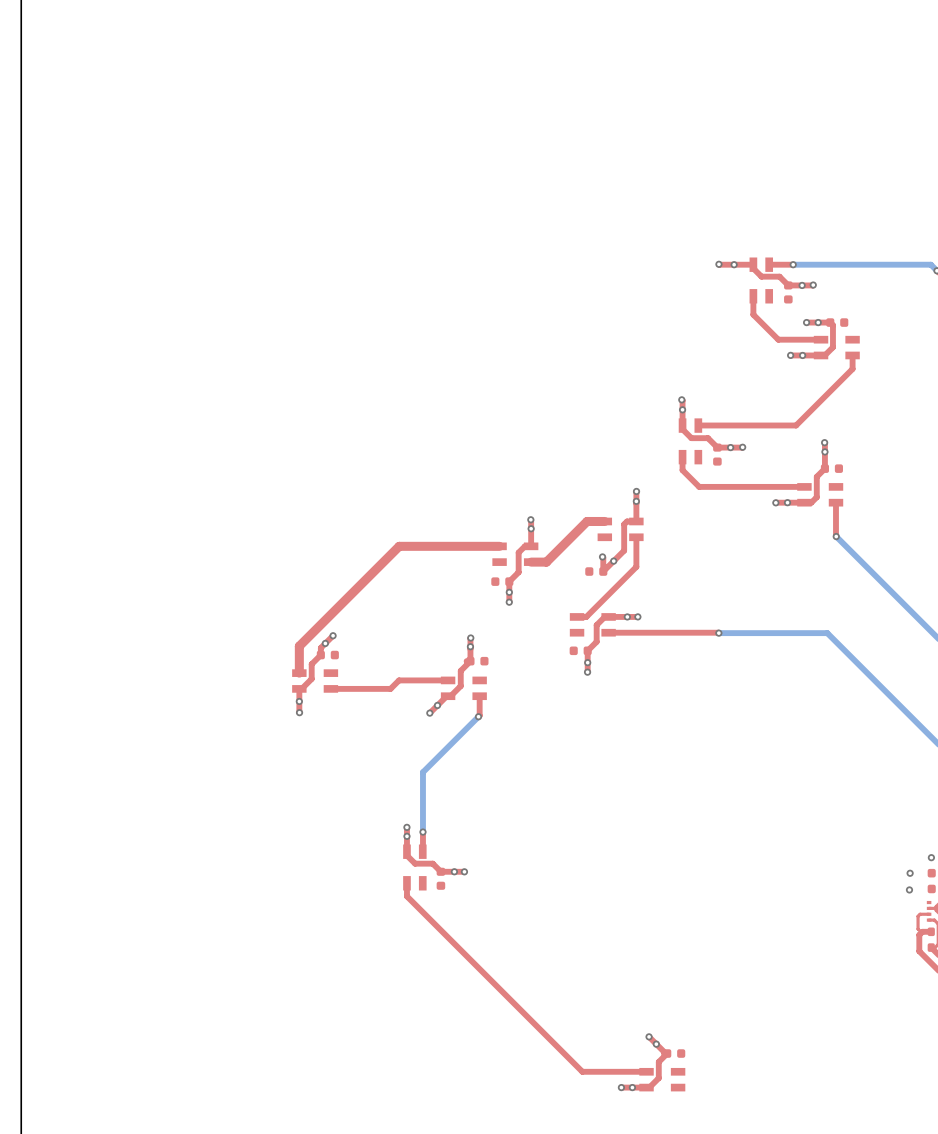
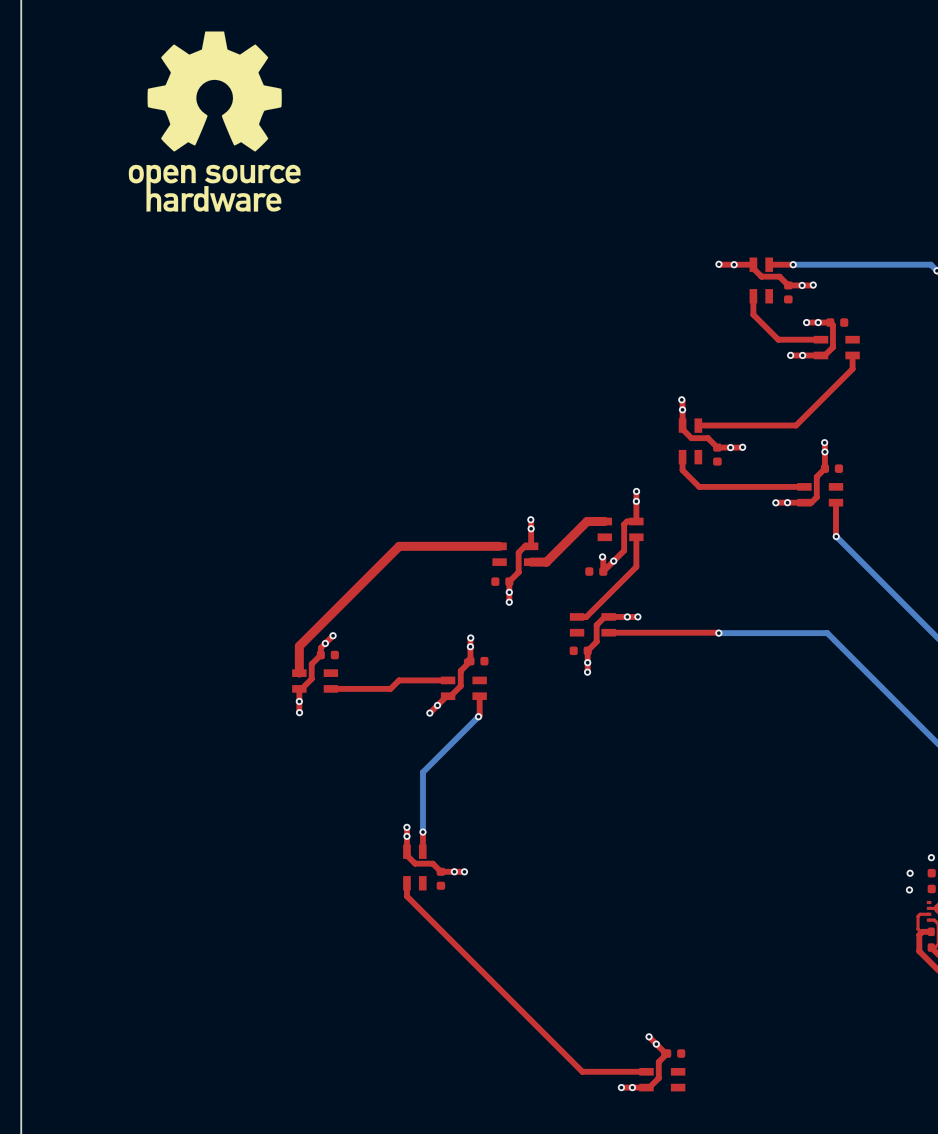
drawing: none -> [128, 31, 301, 212]

